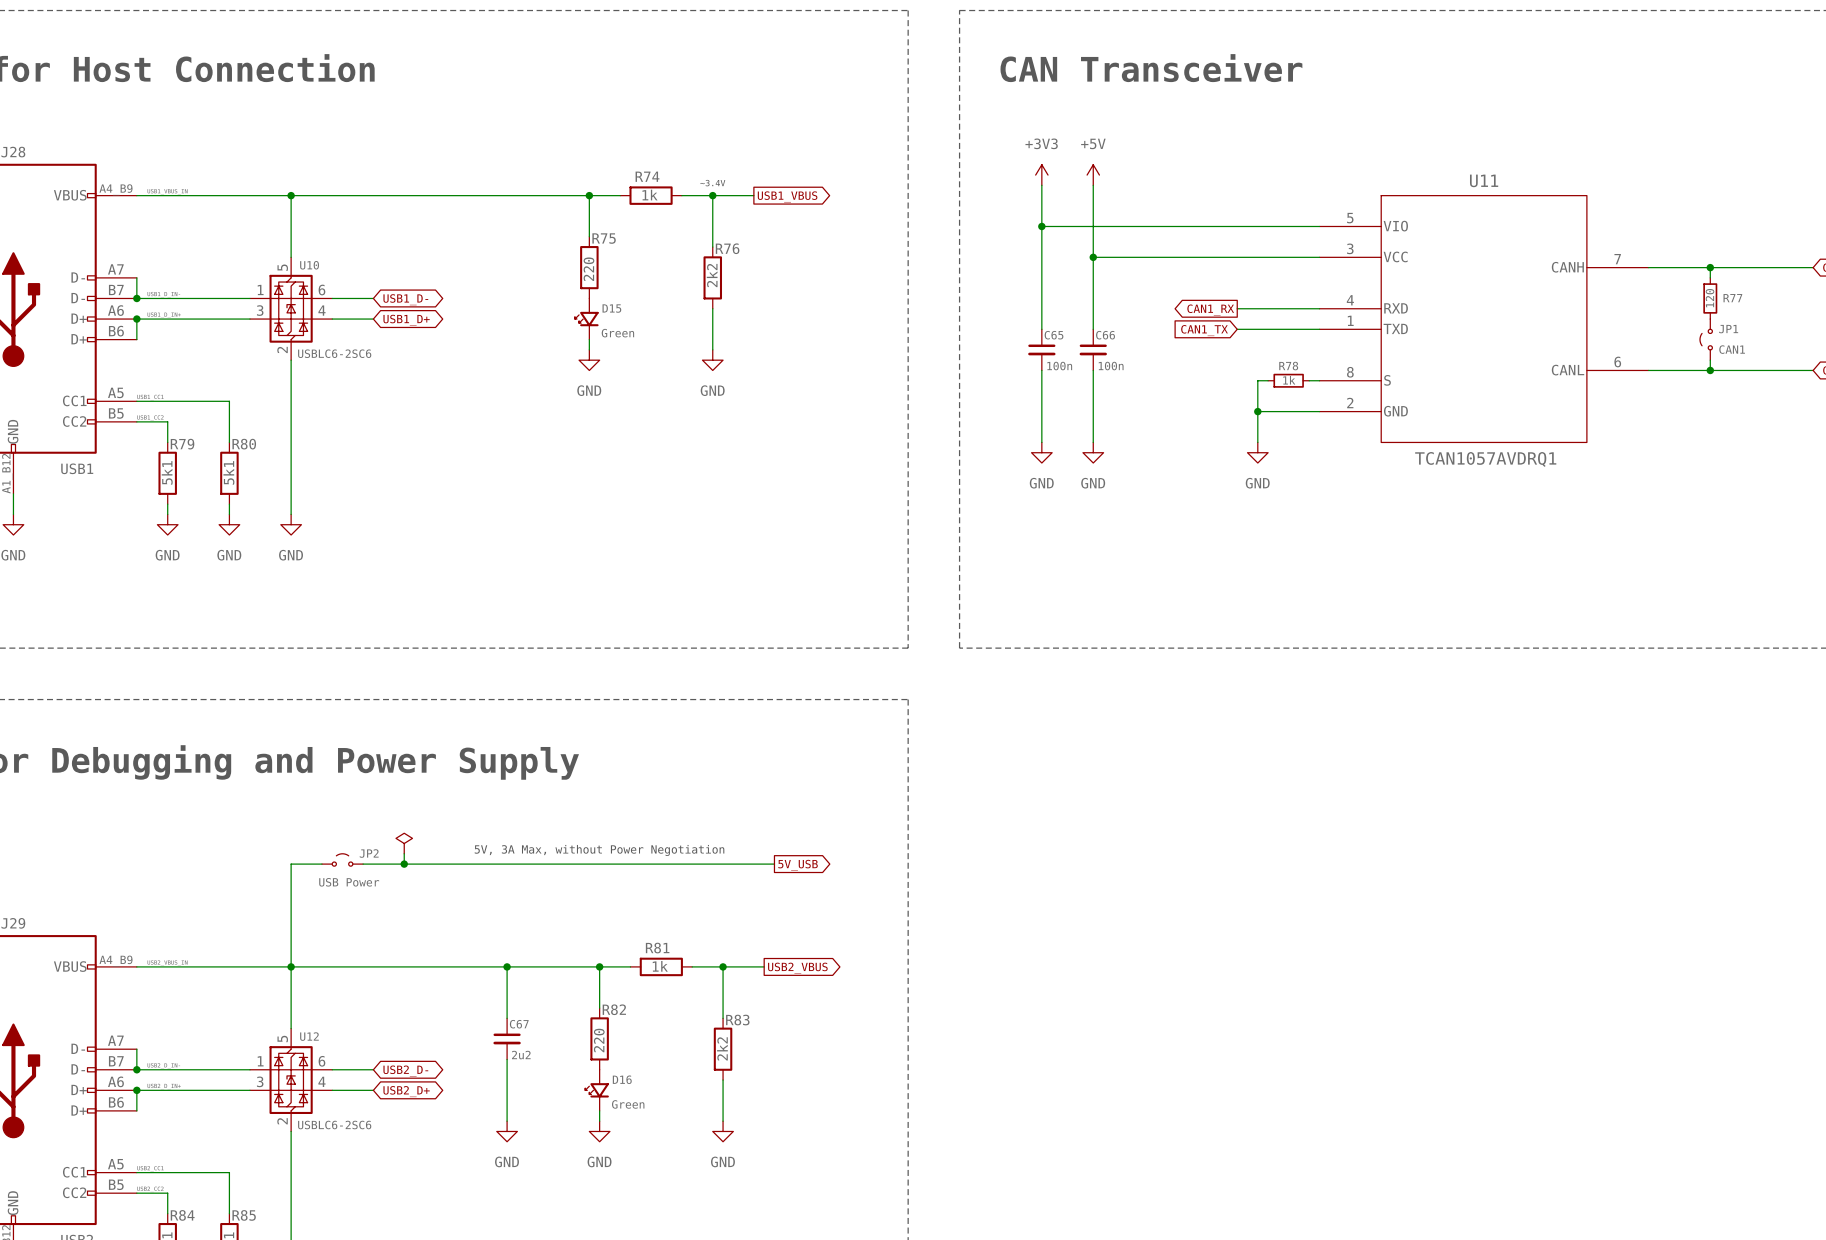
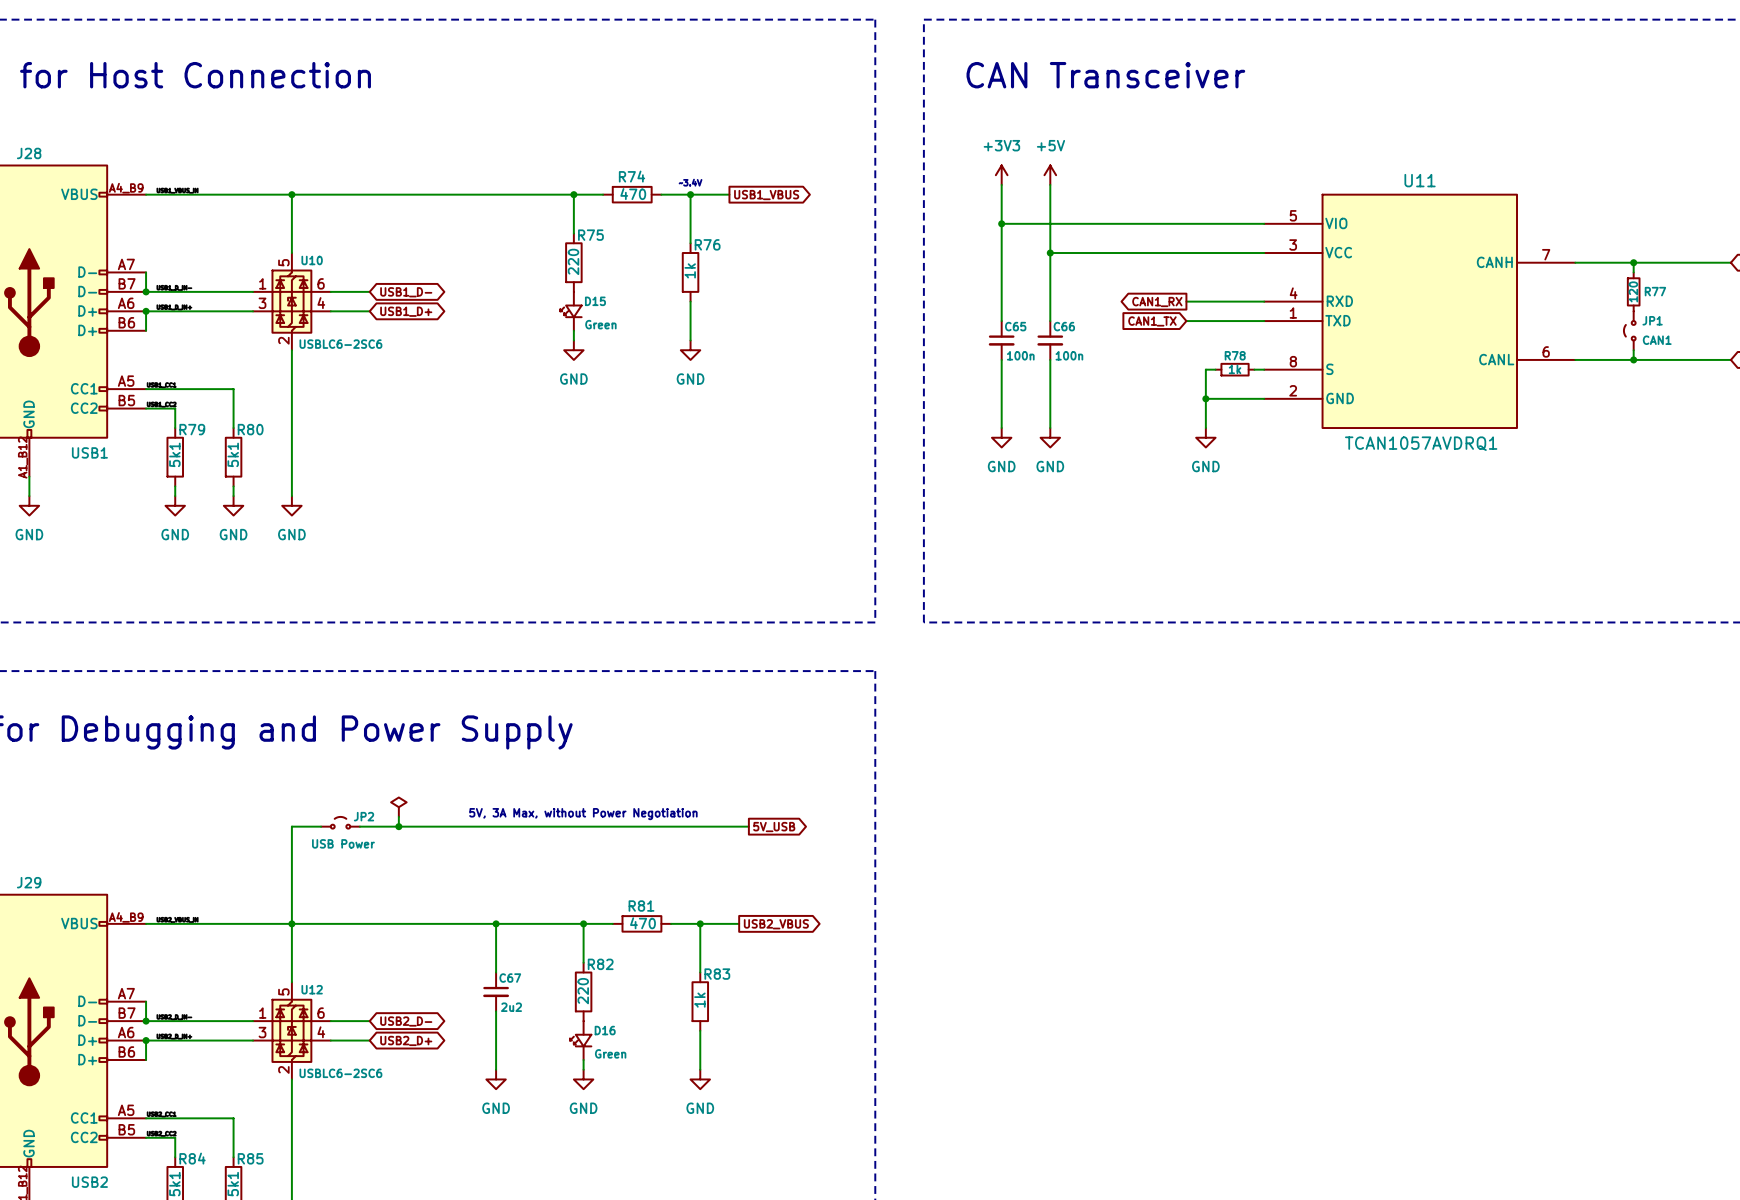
R74 value: 1k (650, 195) -> 470 (633, 194)
R76 value: 2k2 (712, 275) -> 1k (690, 270)
R81 value: 1k (660, 966) -> 470 (642, 923)
R83 value: 2k2 (722, 1048) -> 1k (699, 1000)

